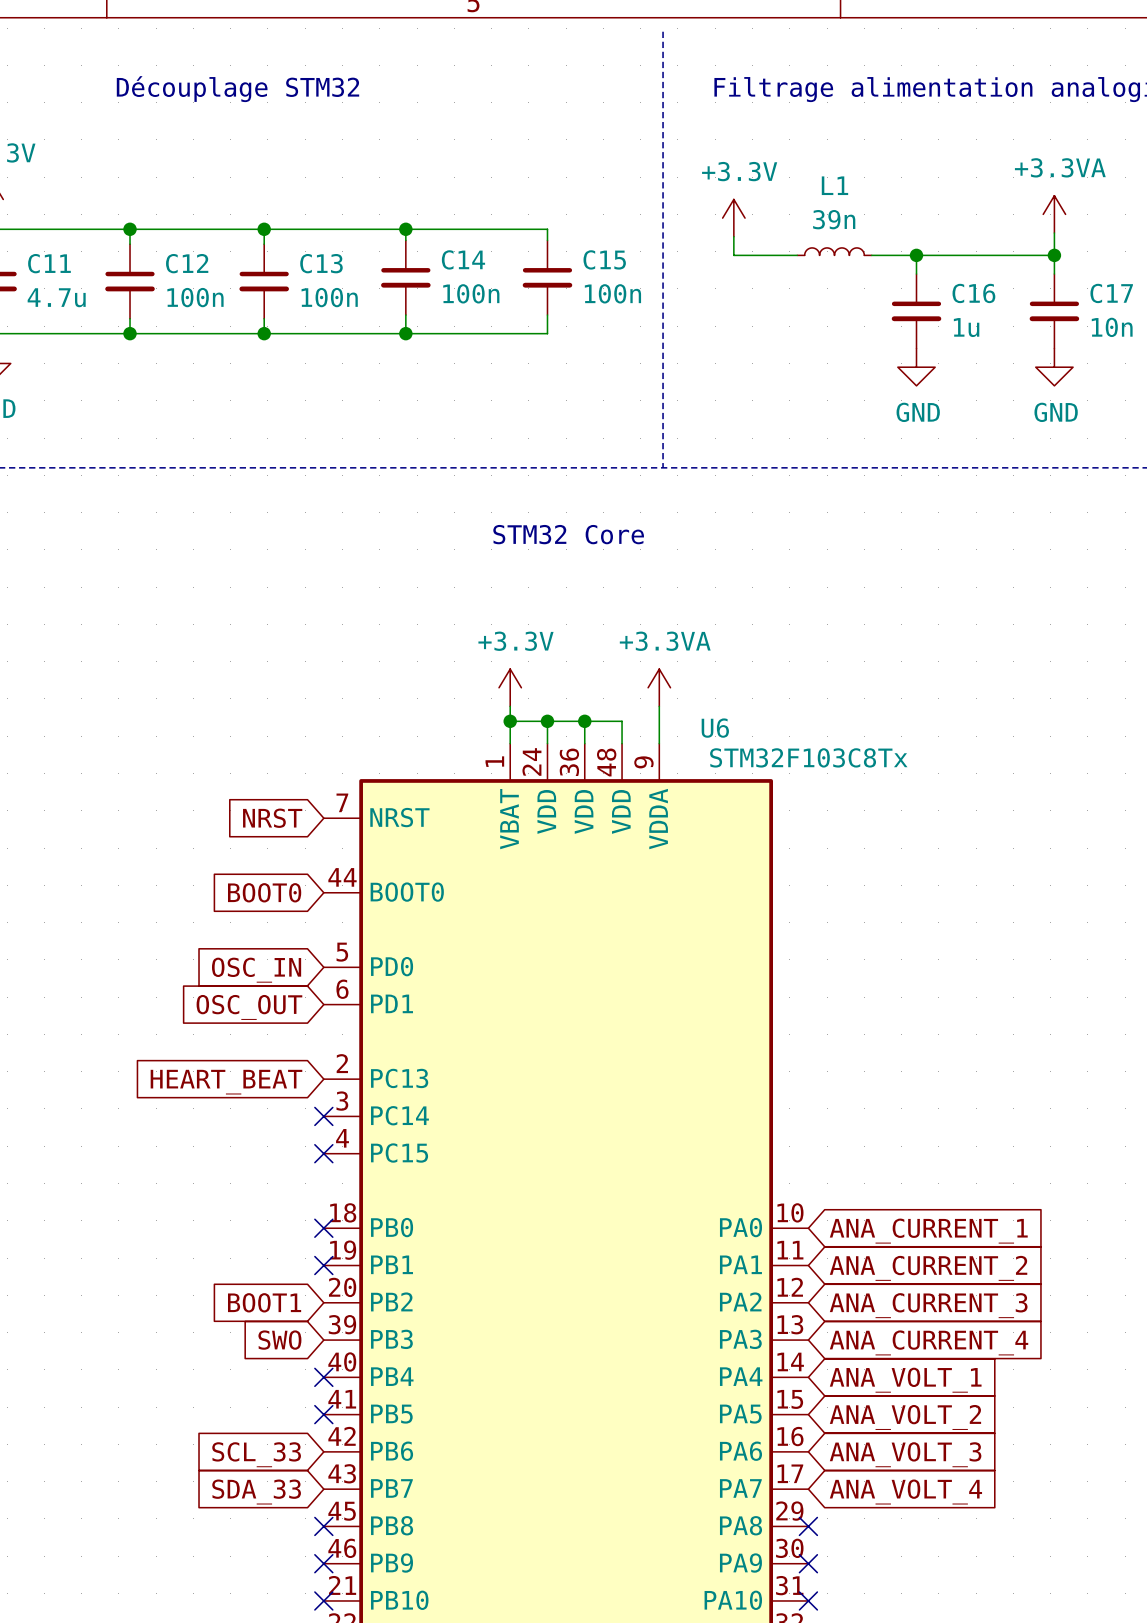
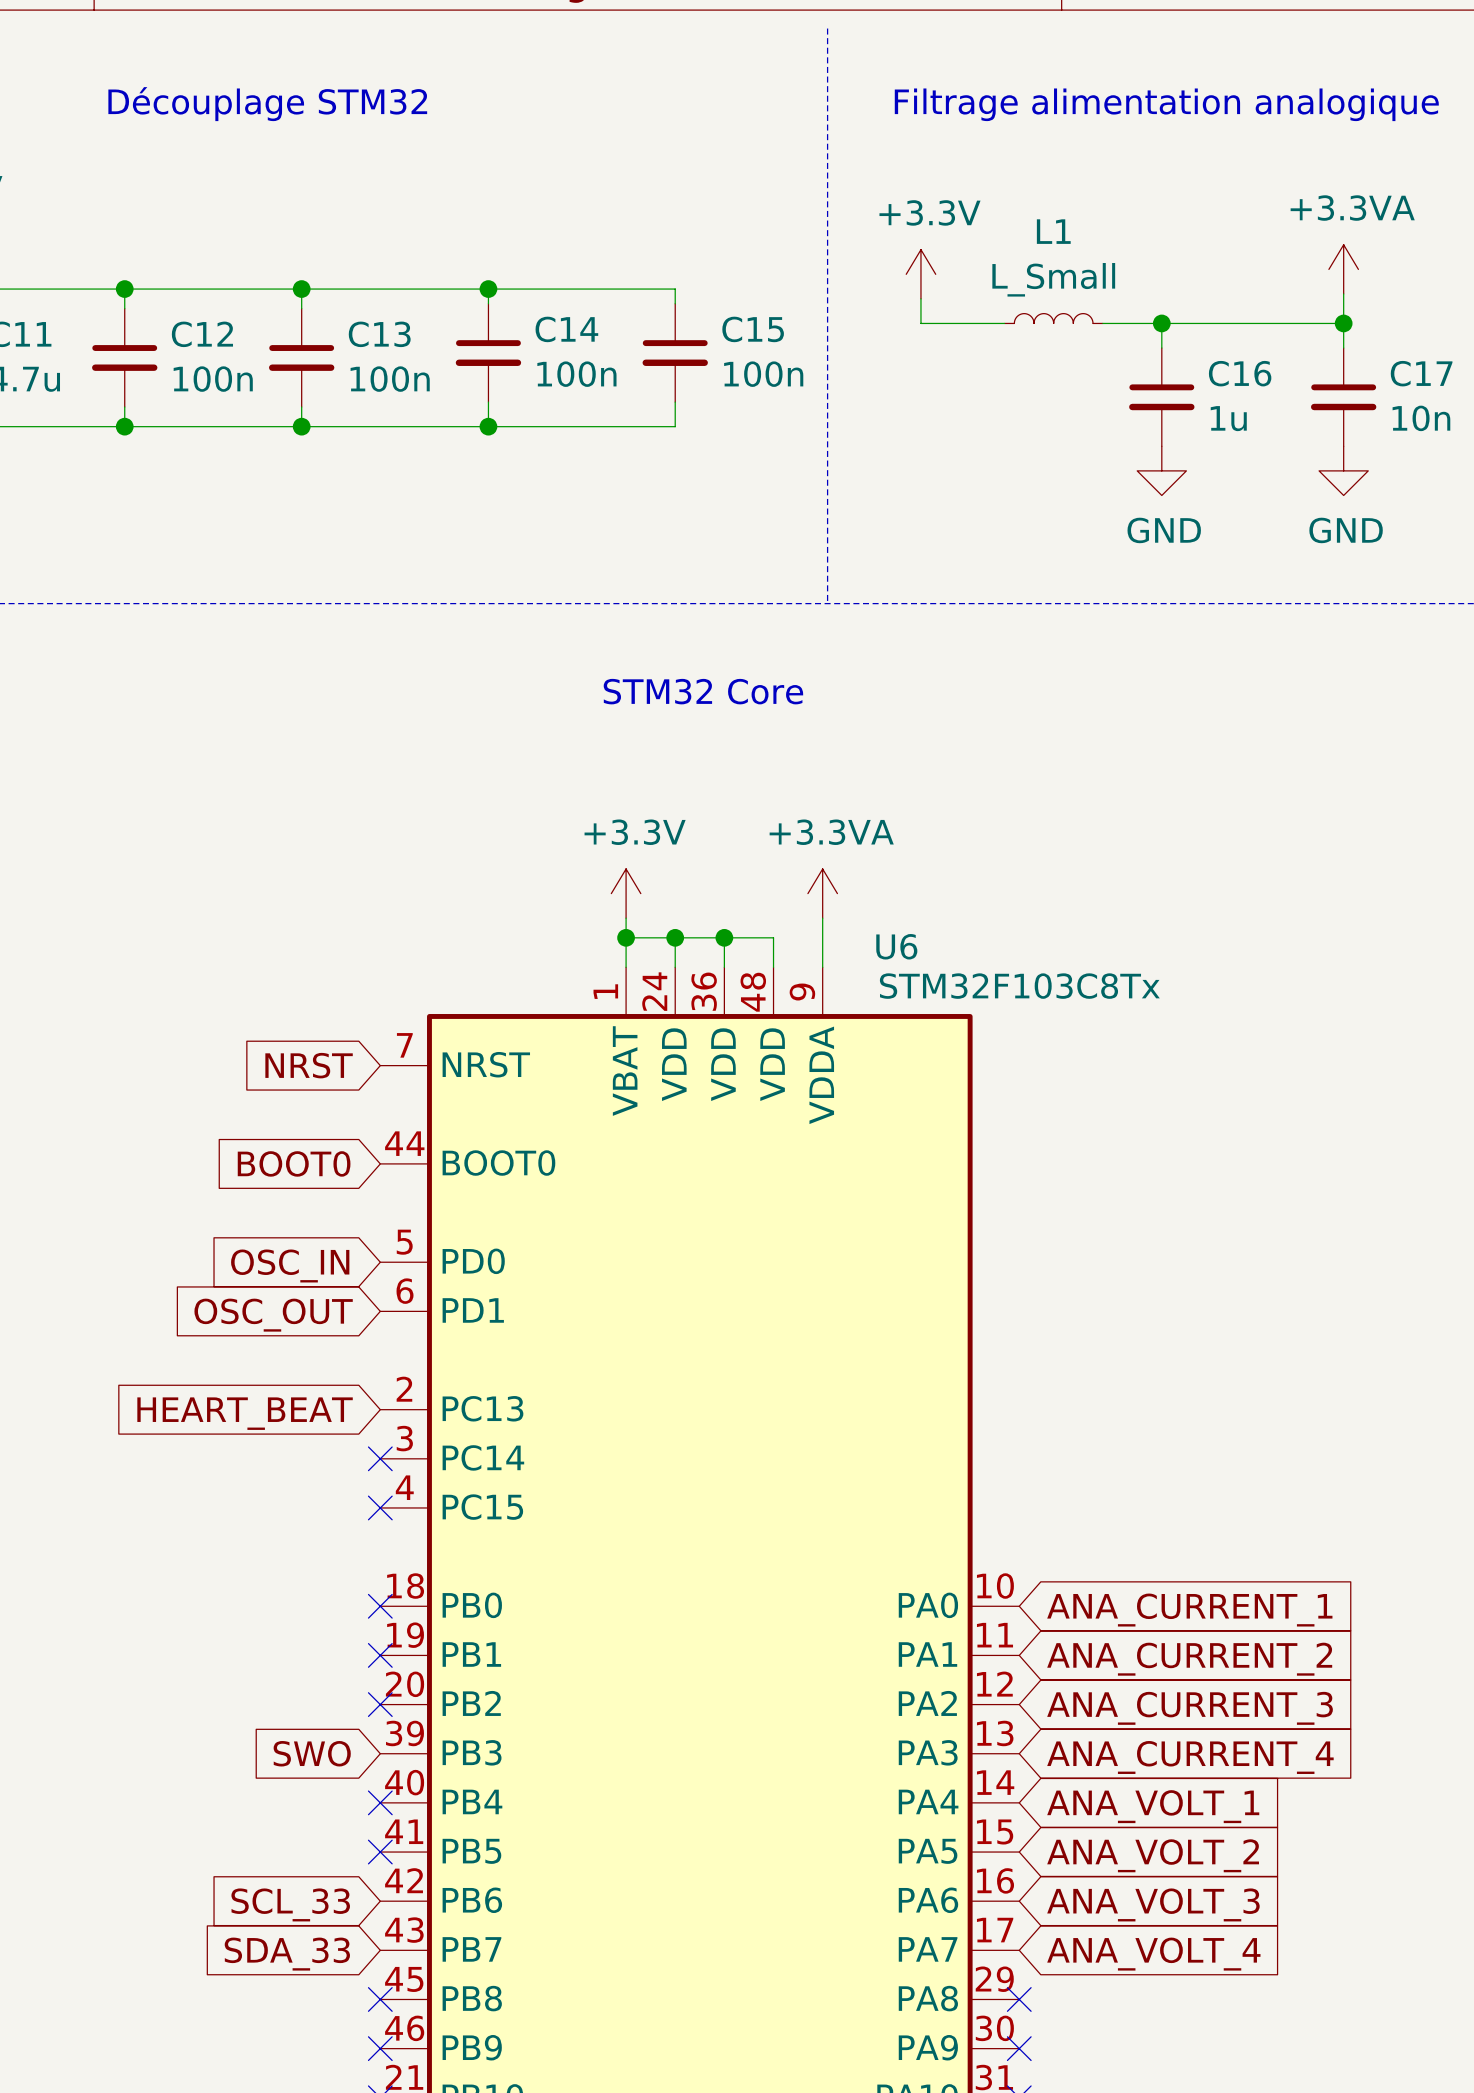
L1 value: 39n (834, 219) -> L_Small (1053, 279)
global label: BOOT1 (264, 1302) -> none
no-connect mark: none -> (380, 1704)

